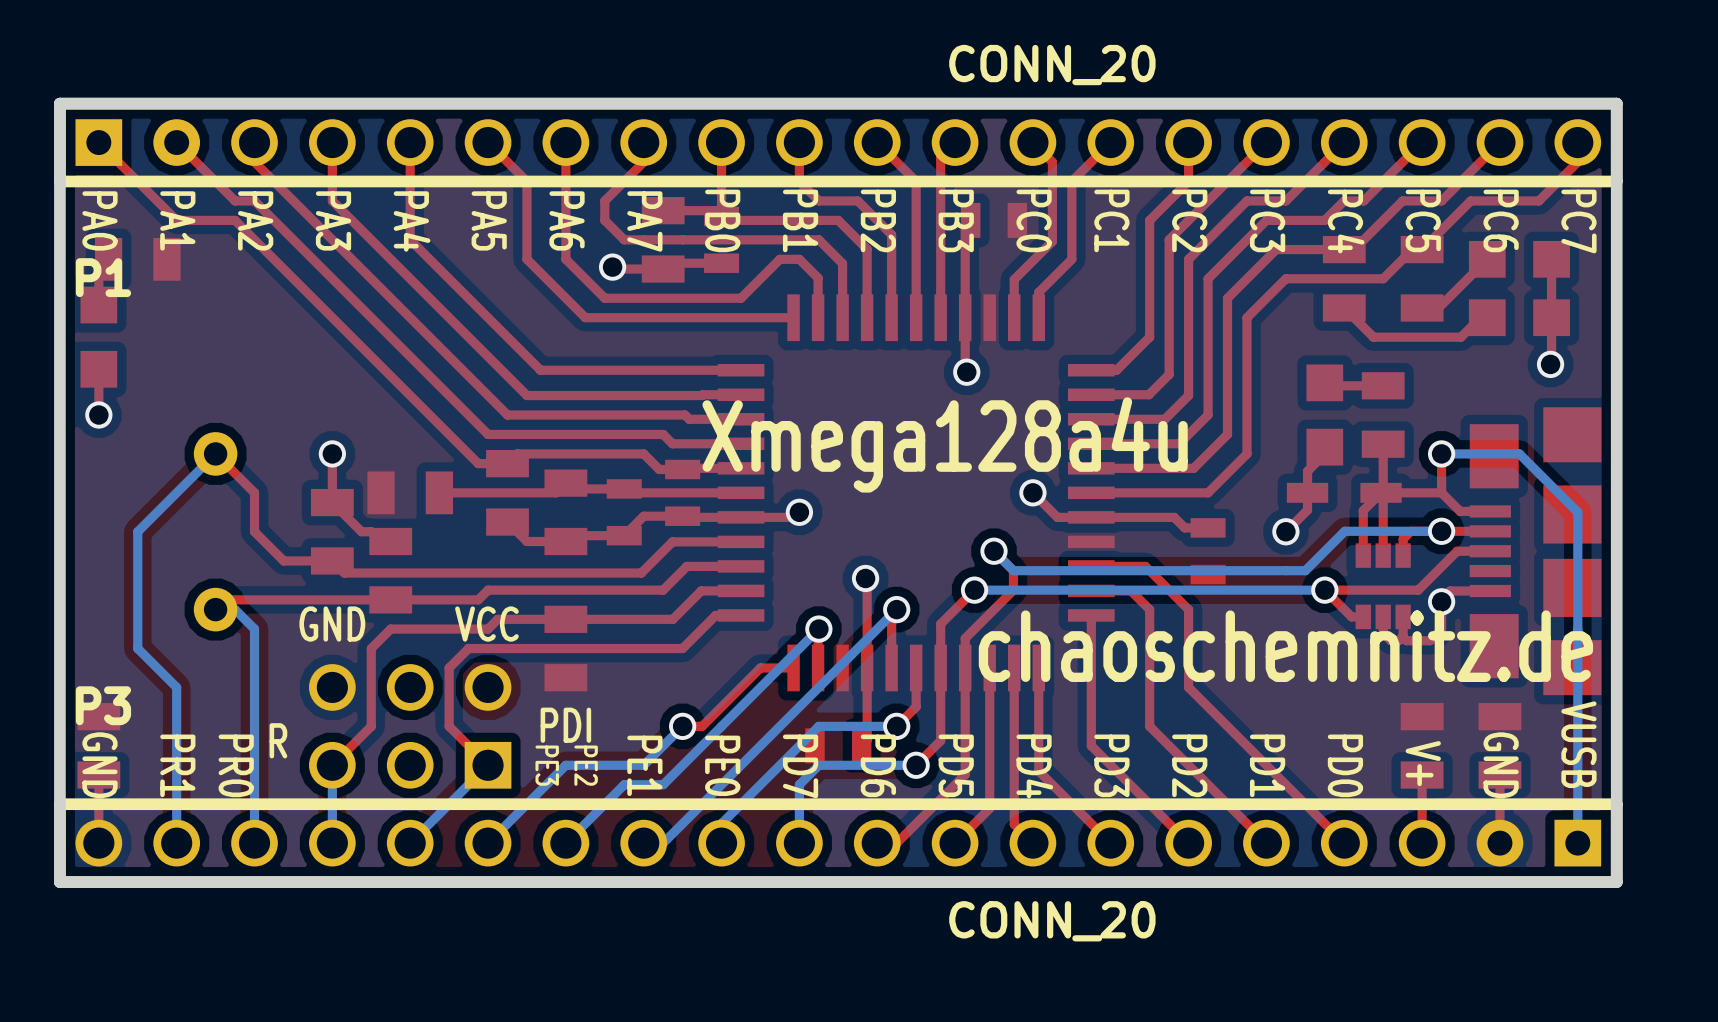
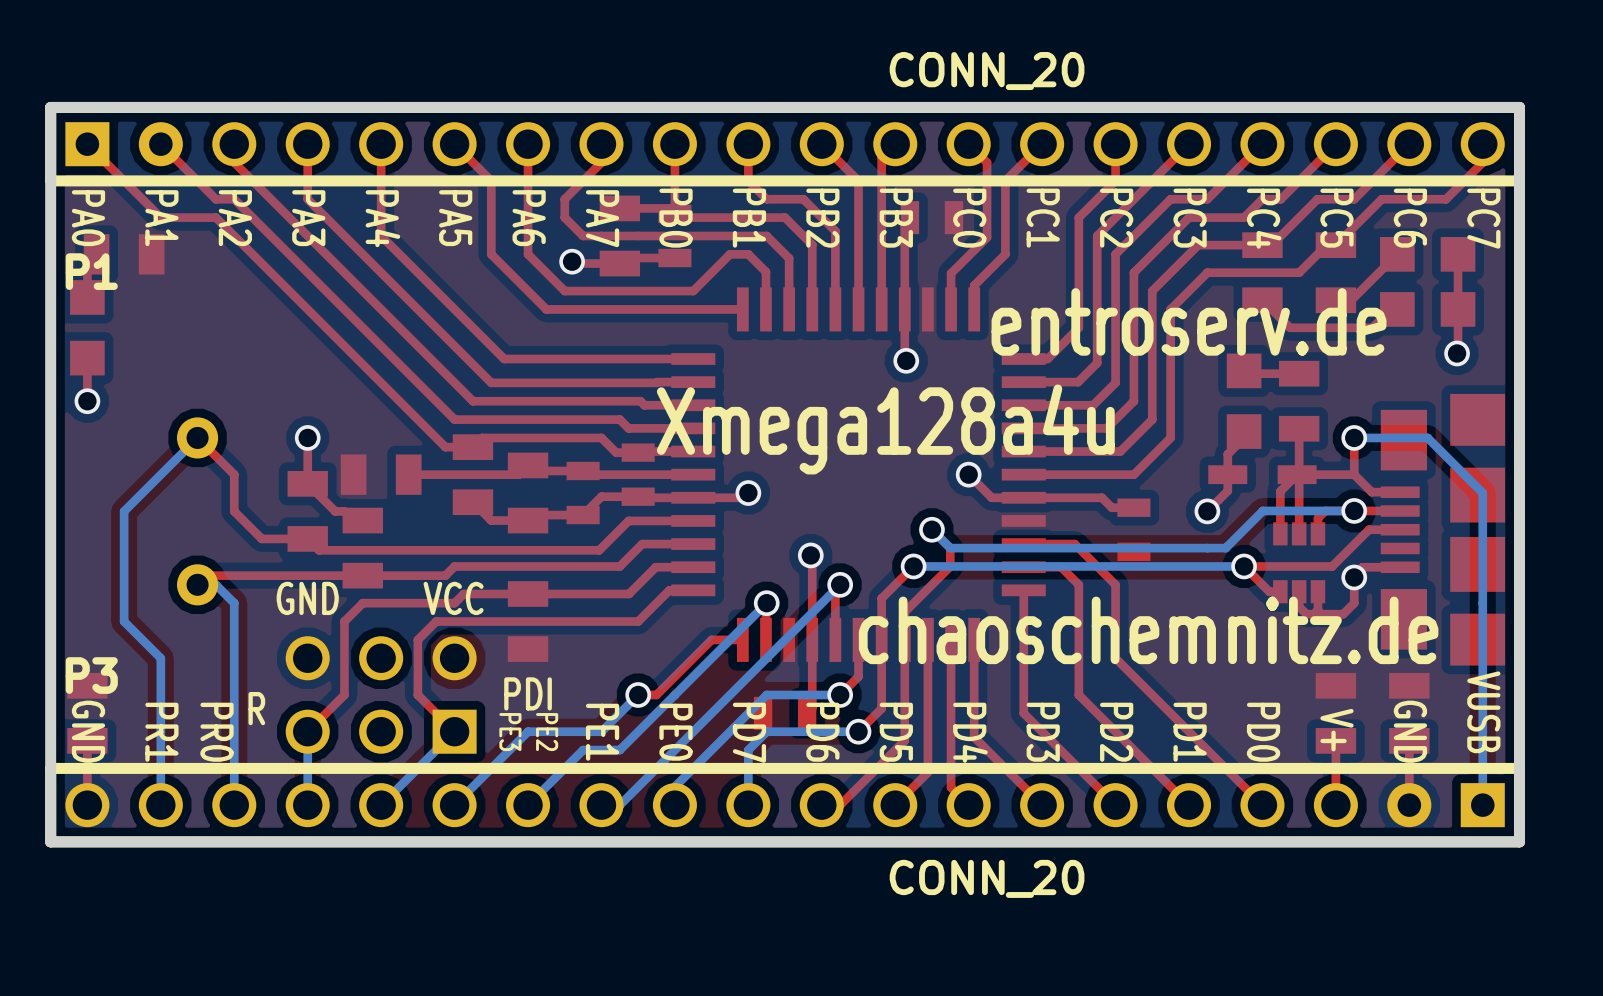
text: none -> entroserv.de (1189, 321)
text position: chaoschemnitz.de (1285, 646) -> chaoschemnitz.de (1148, 630)

